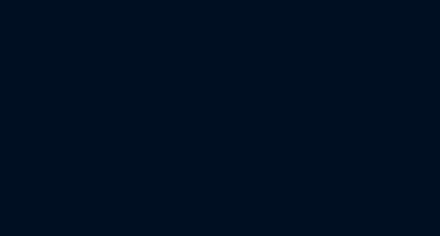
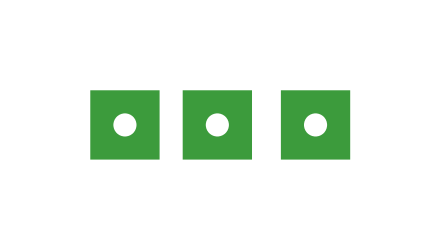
part: none -> (124, 124)
part: none -> (217, 124)
part: none -> (315, 124)

